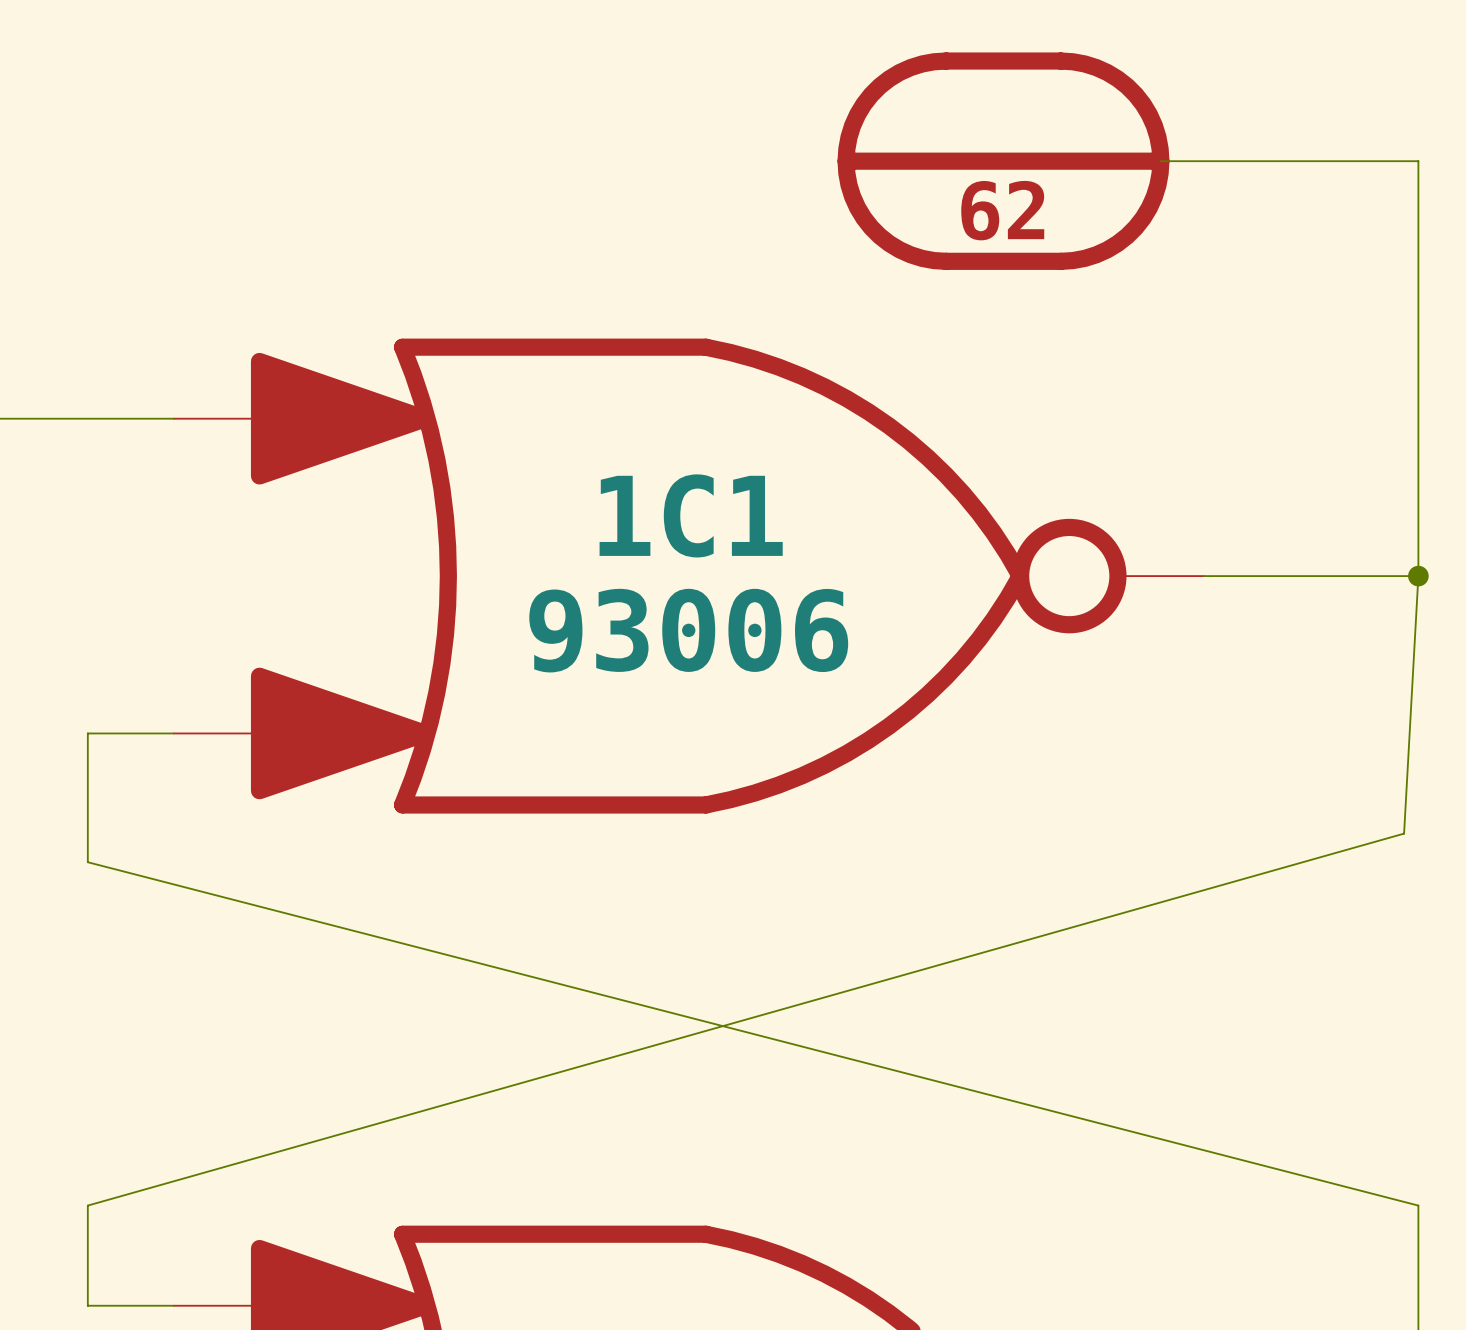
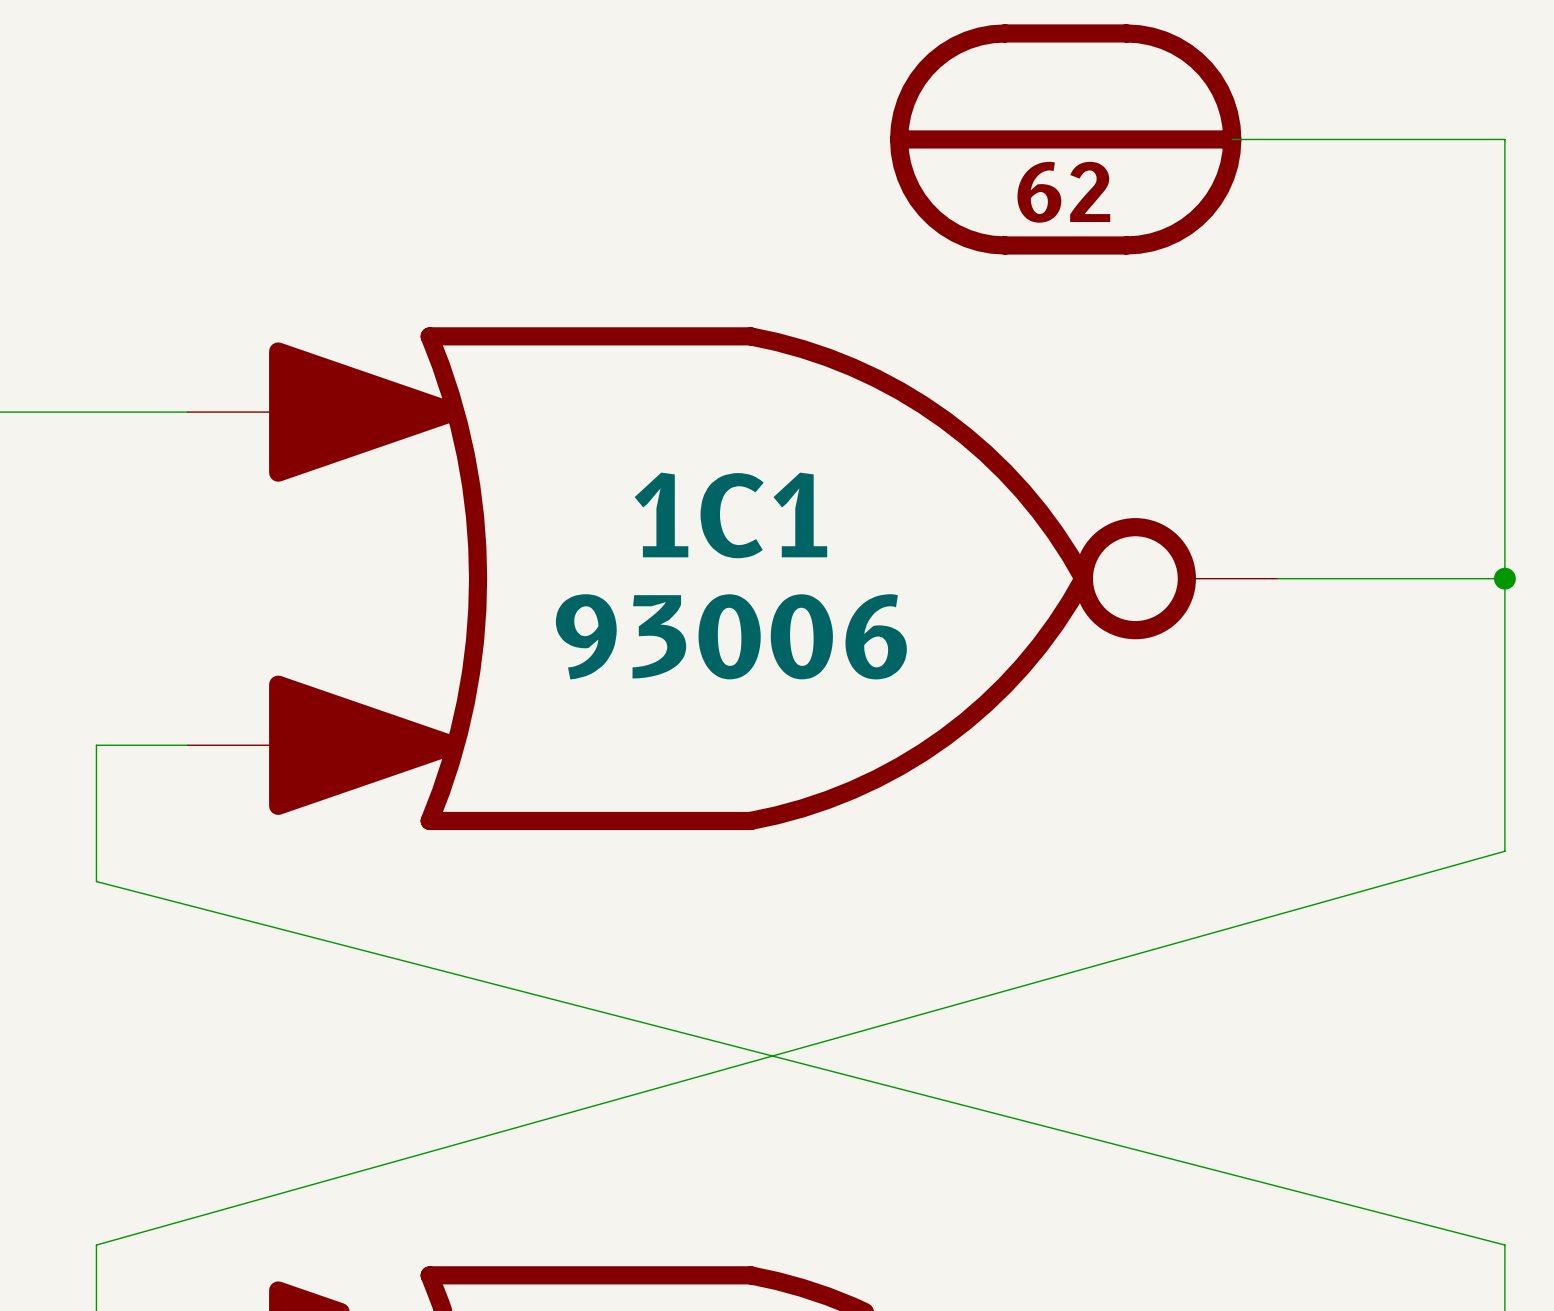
wire: (1418, 576) (1404, 833) (87, 1205) -> (1504, 578) (1504, 851) (96, 1245)

